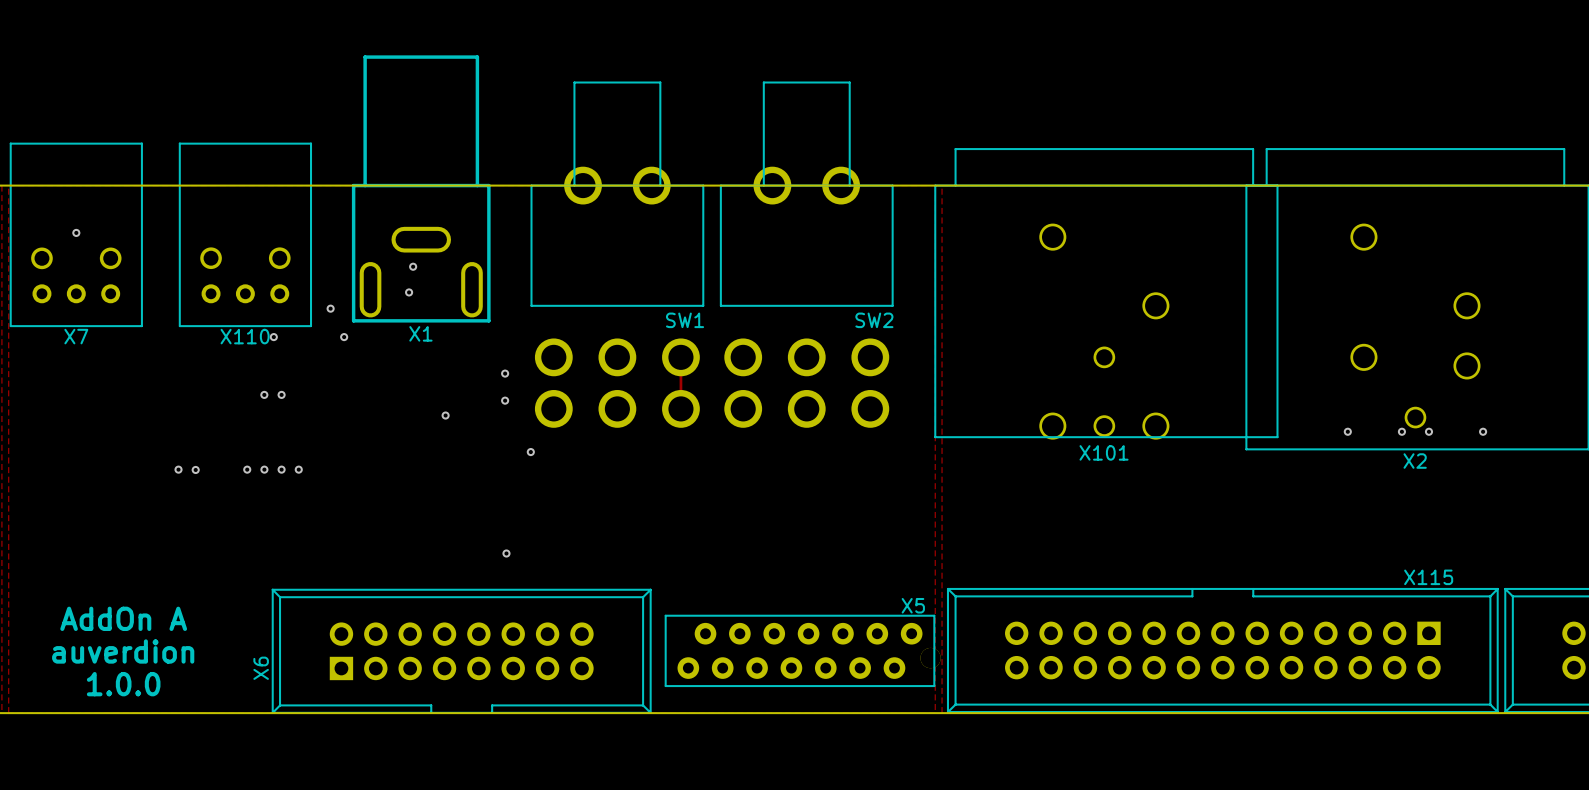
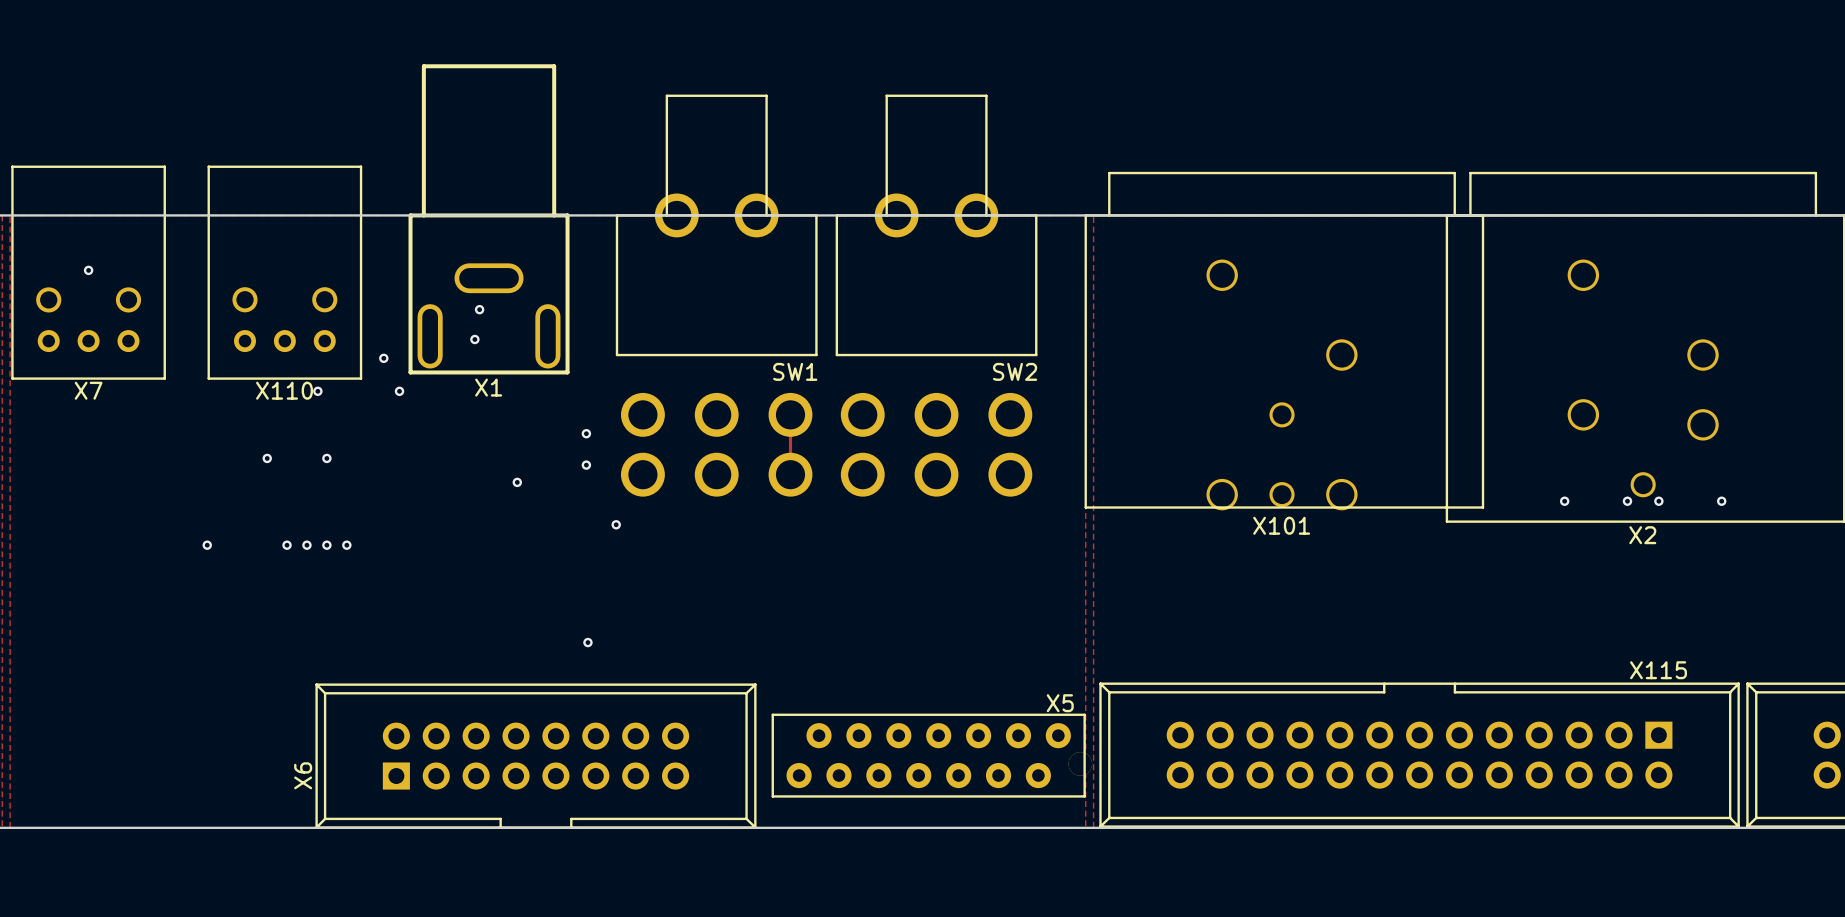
via position: (264, 394) -> (267, 458)
via: (195, 469) -> none
text: AddOn A (123, 618) -> none
text: auverdion (123, 651) -> none
text: 1.0.0 (123, 684) -> none

